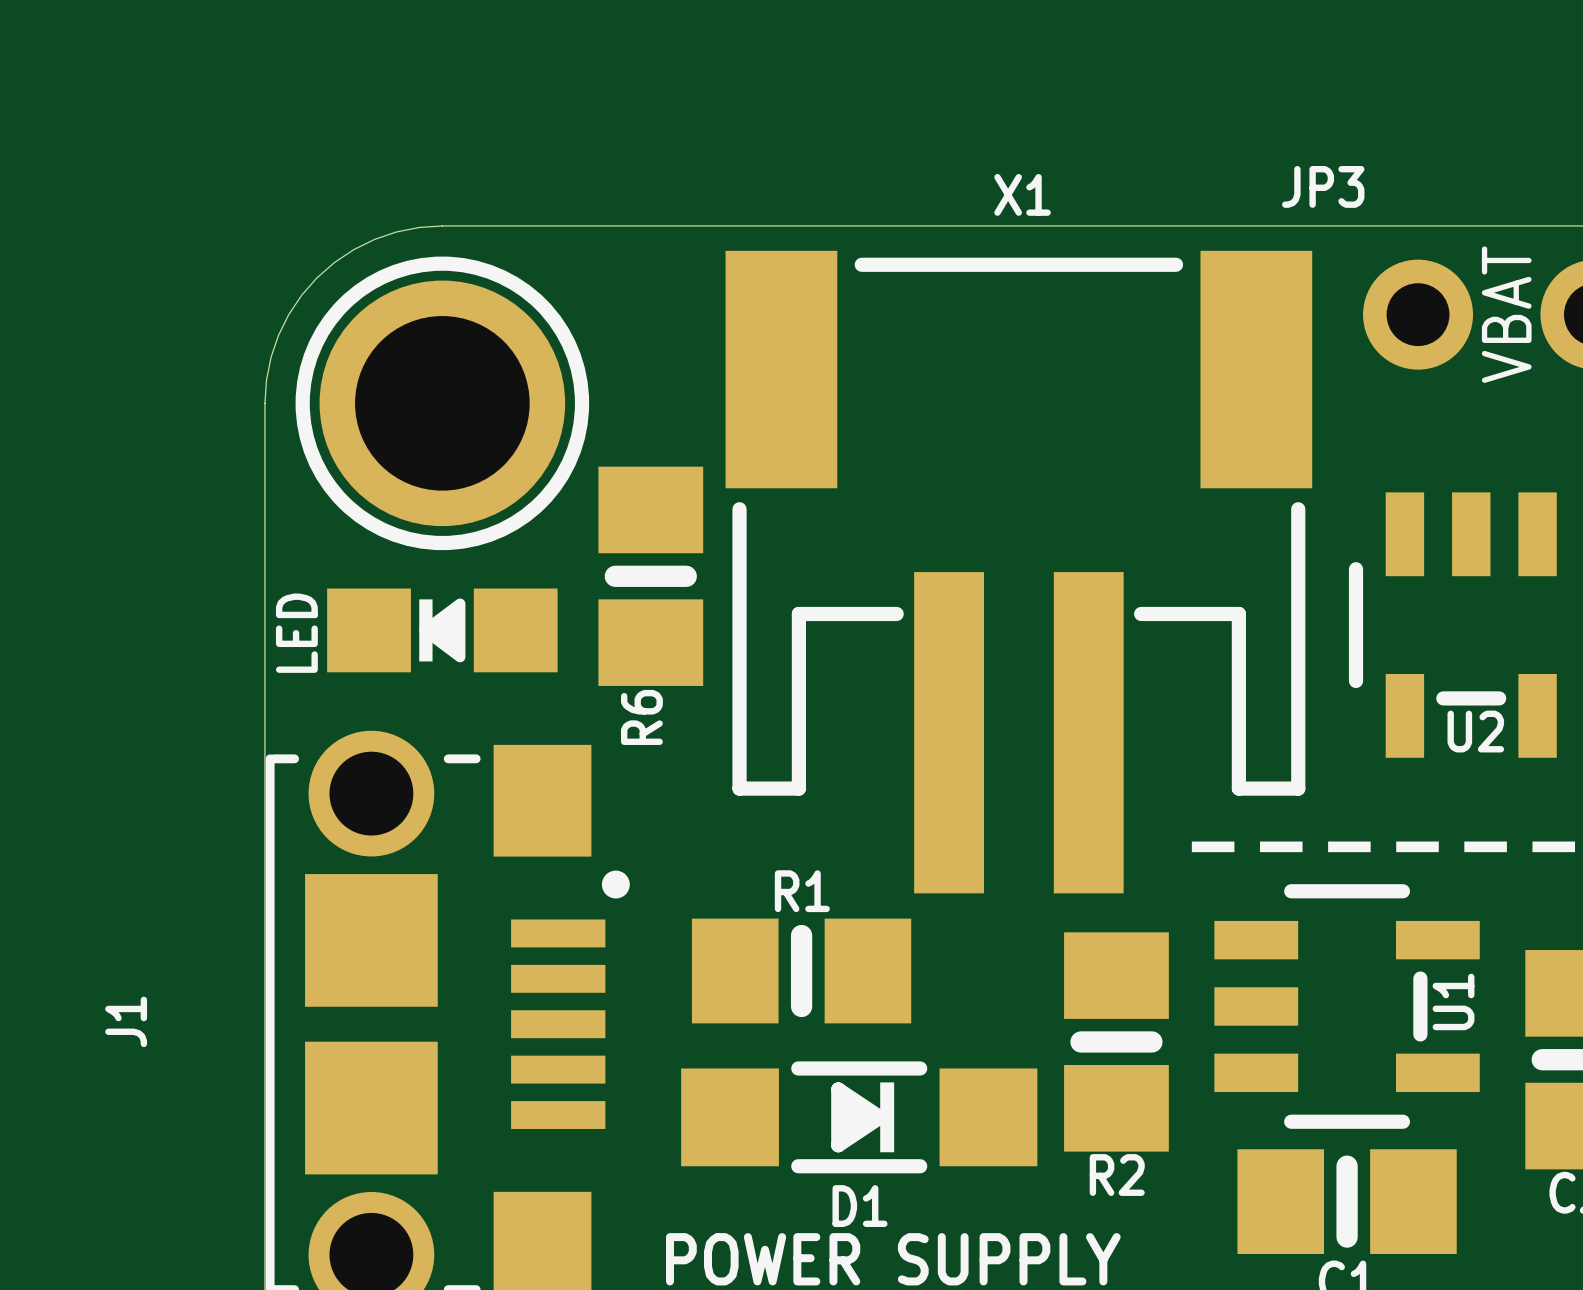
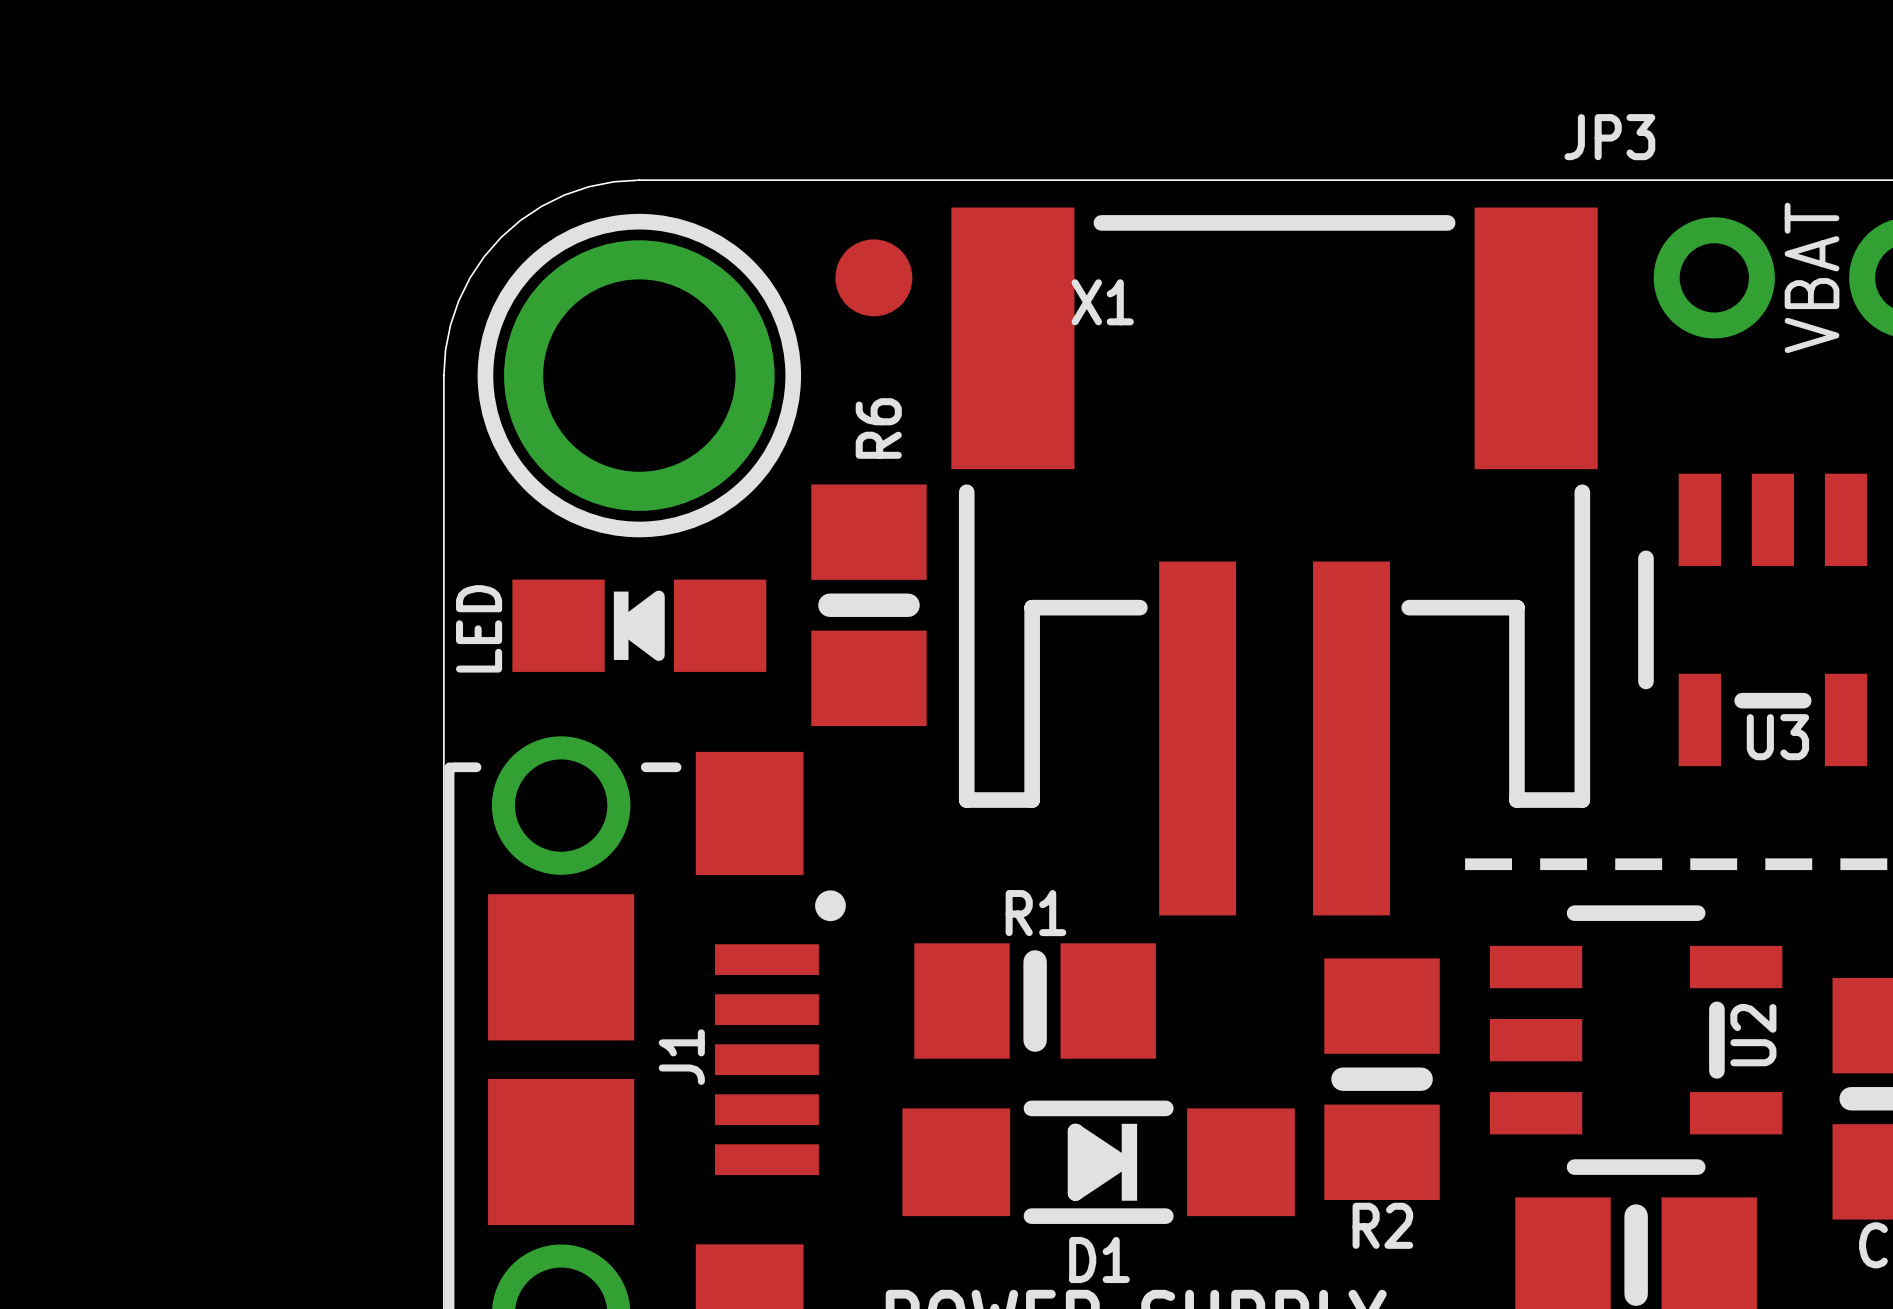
X1 name position: X1 (1022, 194) -> X1 (1102, 302)
part: none -> (873, 277)
R6 position: (650, 576) -> (868, 605)
R6 name position: R6 (641, 717) -> R6 (878, 428)
U2 name: U2 (1475, 731) -> U3 (1777, 737)
U1 name: U1 (1453, 1001) -> U2 (1753, 1035)
J1 name position: J1 (126, 1021) -> J1 (681, 1057)

